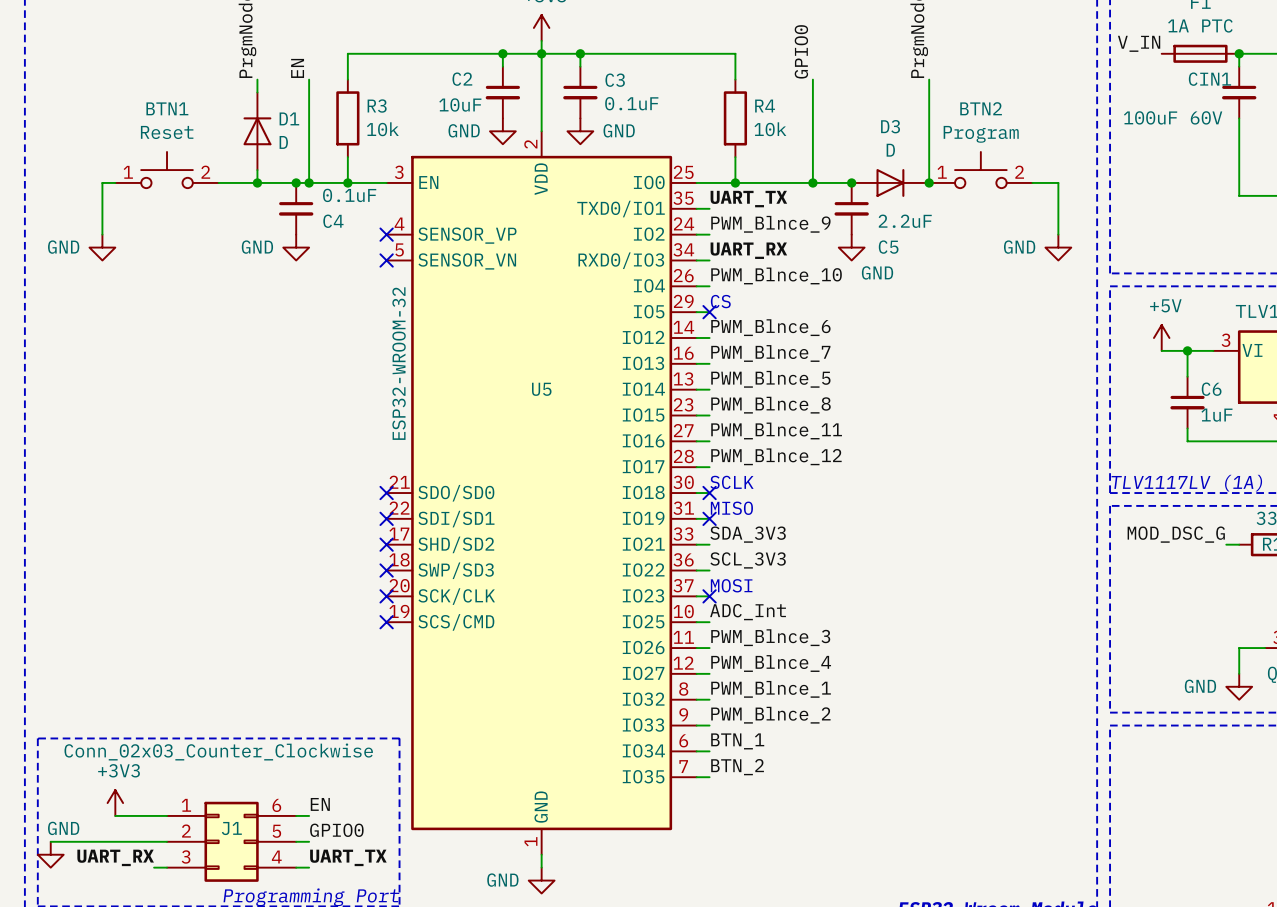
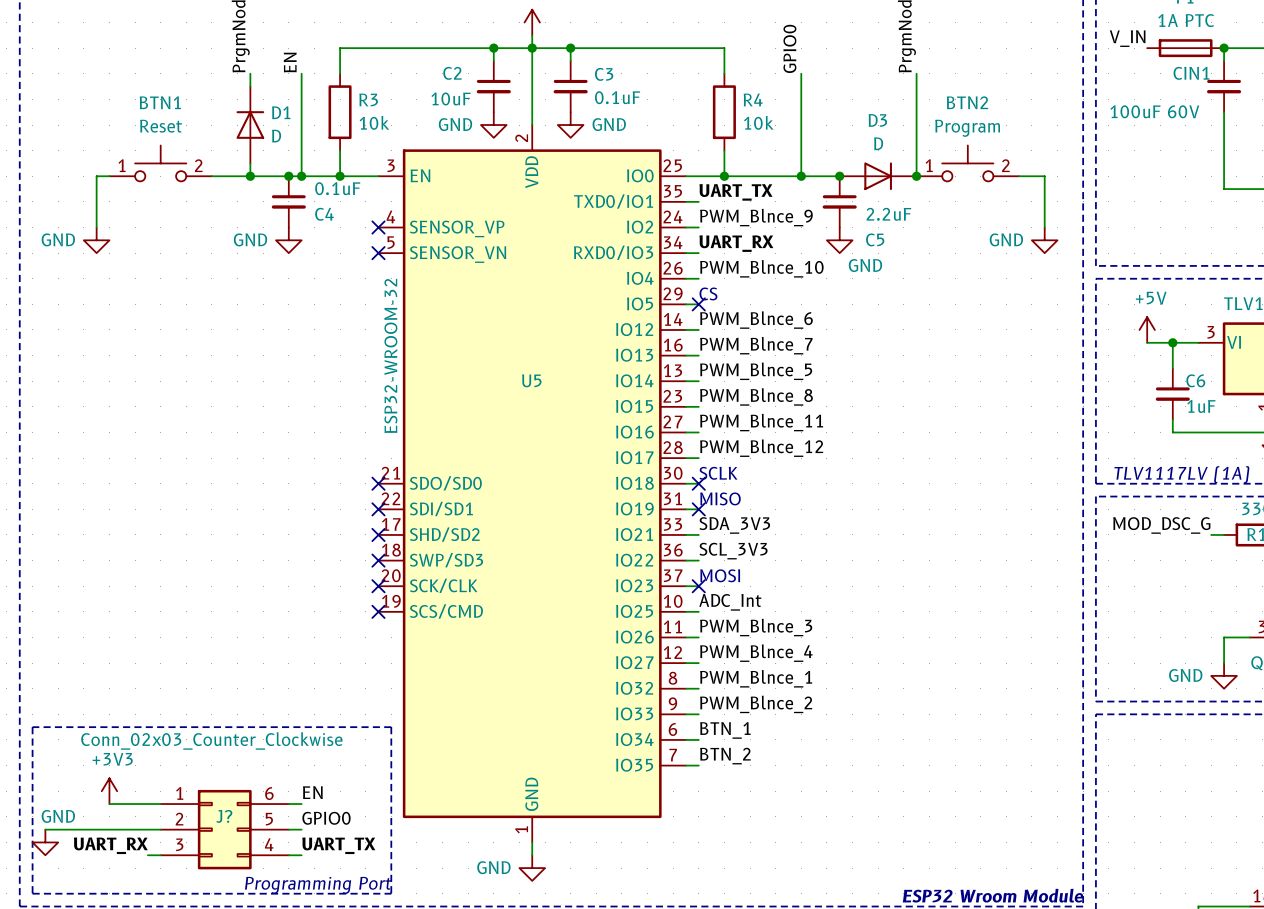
J1 name: J1 (231, 828) -> J? (224, 816)

